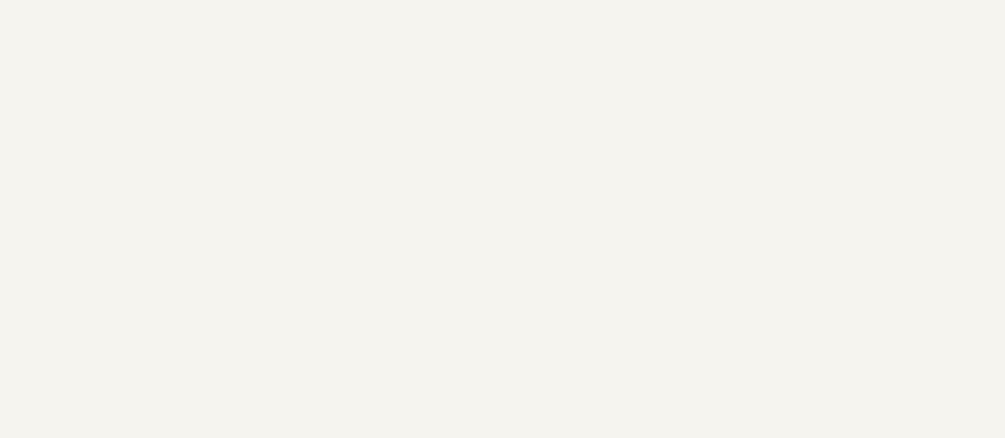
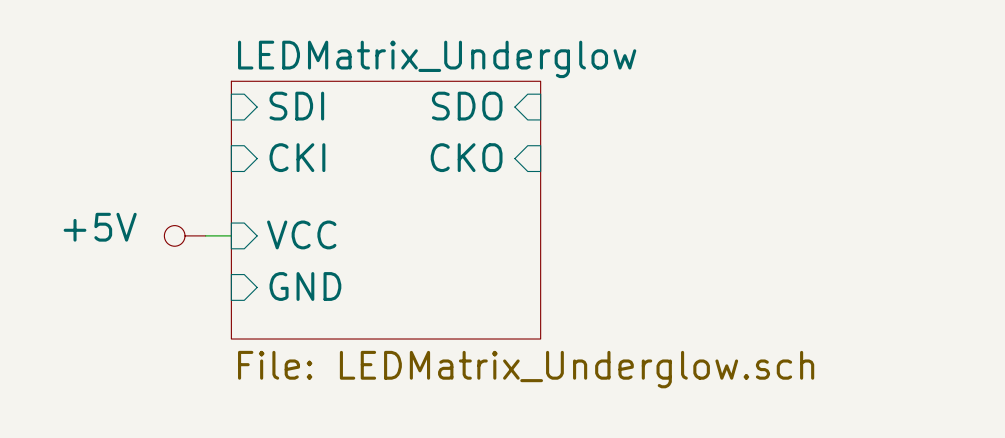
sheet pin: none -> SDI (296, 106)
sheet pin: none -> SDO (467, 106)
sheet pin: none -> CKI (297, 157)
sheet pin: none -> CKO (466, 157)
sheet LEDMatrix_Underglow: none -> File: LEDMatrix_Underglow.sch (386, 210)
sheet pin: none -> VCC (301, 234)
power symbol: none -> +5V (185, 235)
wire: none -> (205, 235) (231, 235)
sheet pin: none -> GND (305, 286)

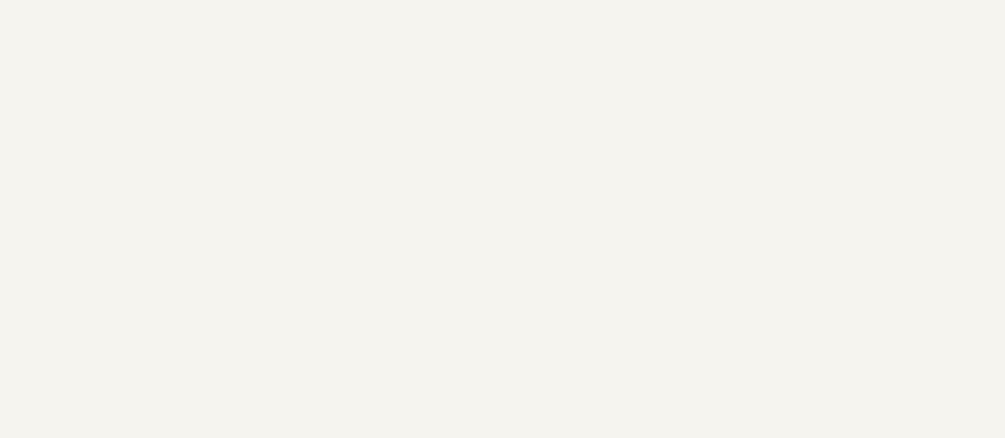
sheet pin: SDI (296, 106) -> none
sheet pin: SDO (467, 106) -> none
sheet pin: CKI (297, 157) -> none
sheet pin: CKO (466, 157) -> none
sheet LEDMatrix_Underglow: File: LEDMatrix_Underglow.sch (386, 210) -> none
sheet pin: VCC (301, 234) -> none
power symbol: +5V (185, 235) -> none
wire: (205, 235) (231, 235) -> none
sheet pin: GND (305, 286) -> none

